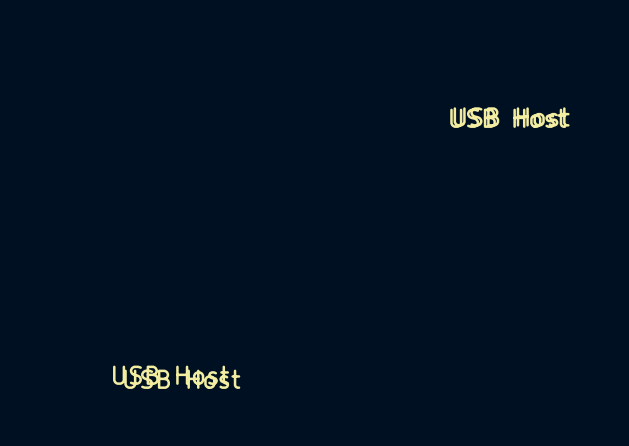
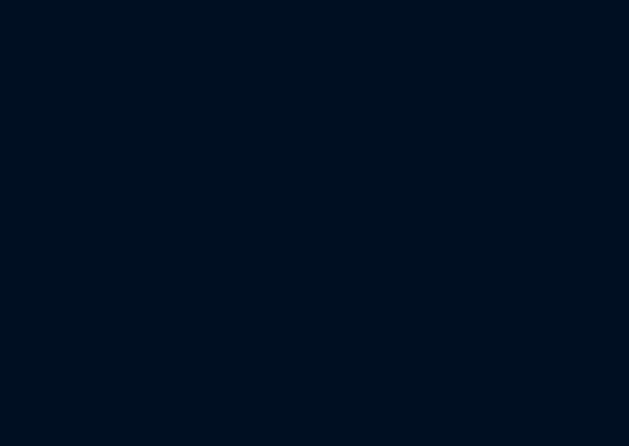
drawing: [450, 107, 570, 128] -> none
drawing: [113, 365, 241, 389] -> none

